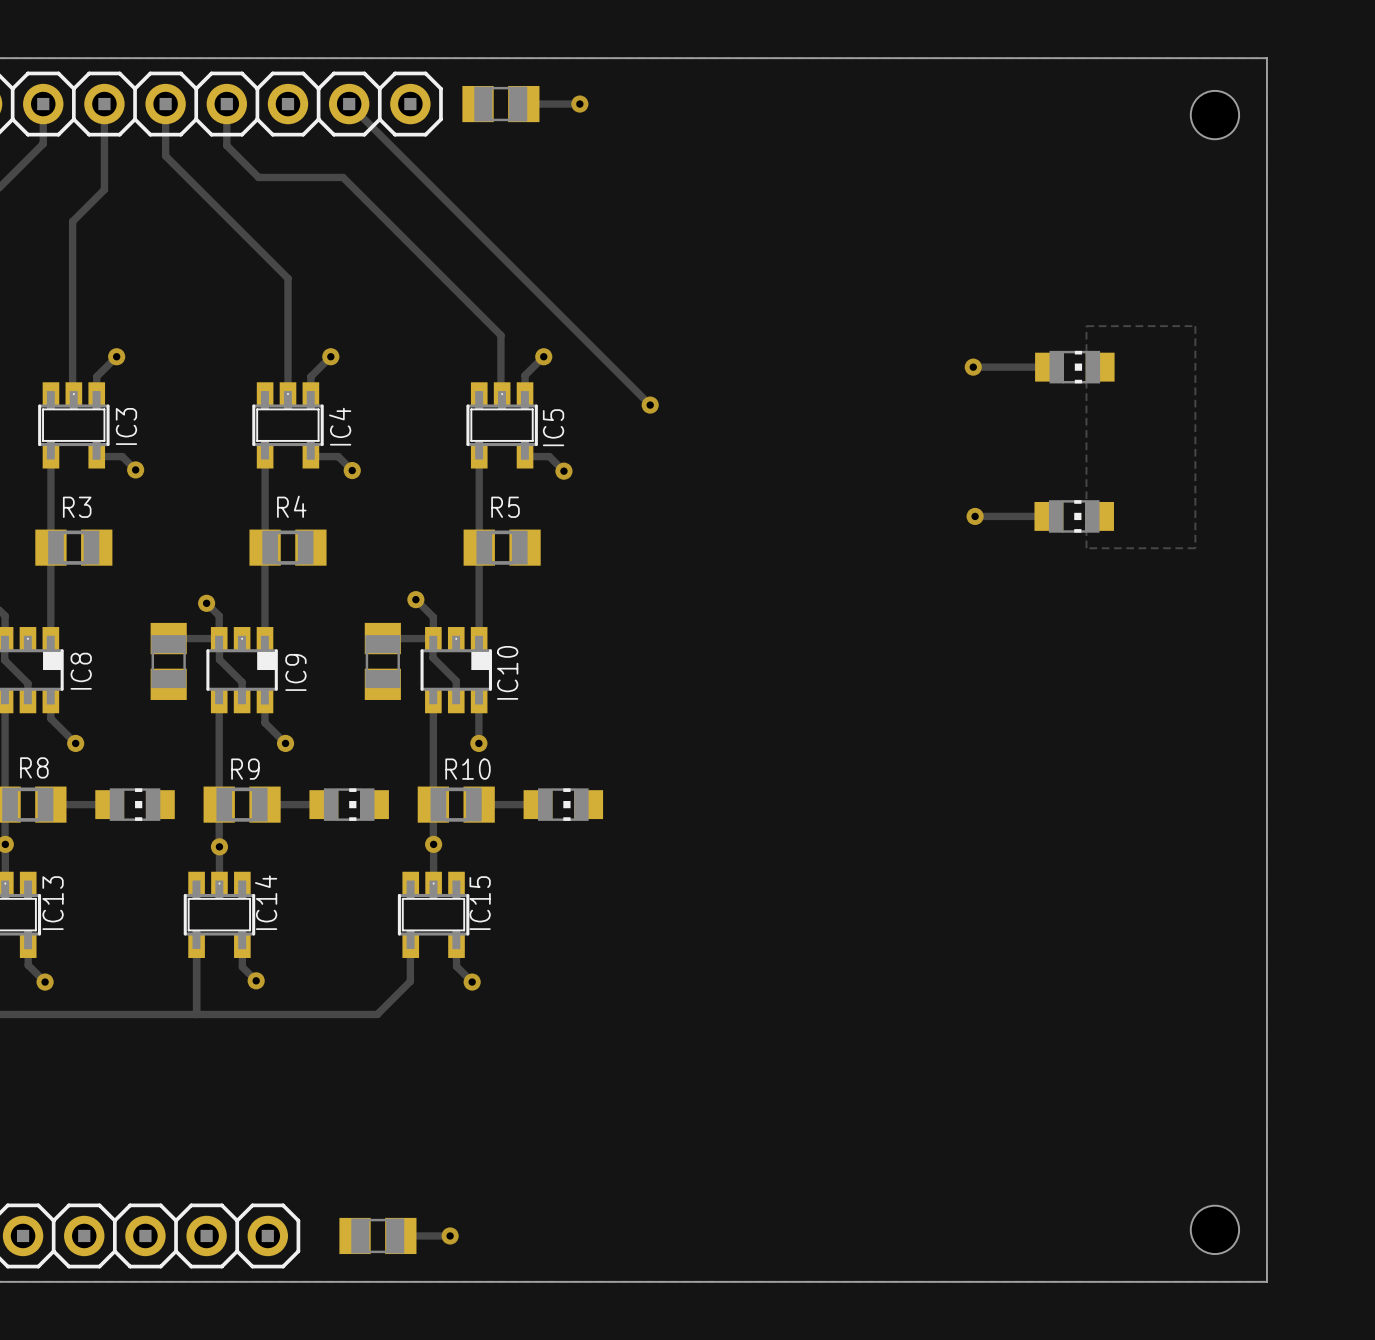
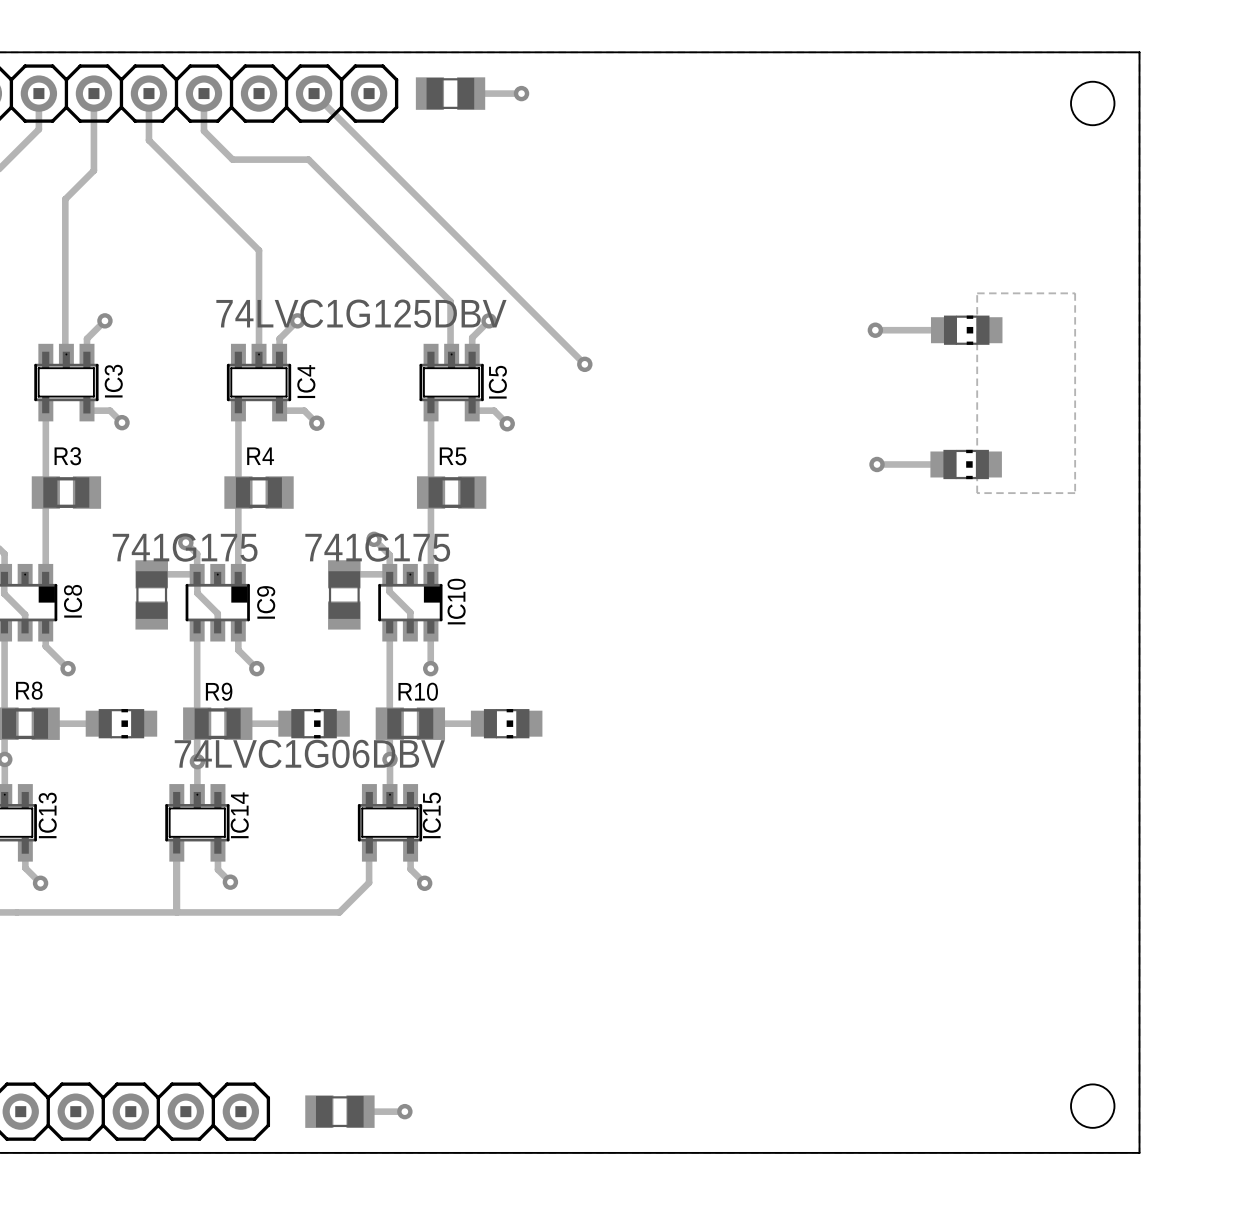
IC5 value: none -> 74LVC1G125DBV (361, 313)
IC9 value: none -> 741G175 (185, 547)
IC10 value: none -> 741G175 (377, 547)
IC15 value: none -> 74LVC1G06DBV (309, 753)

